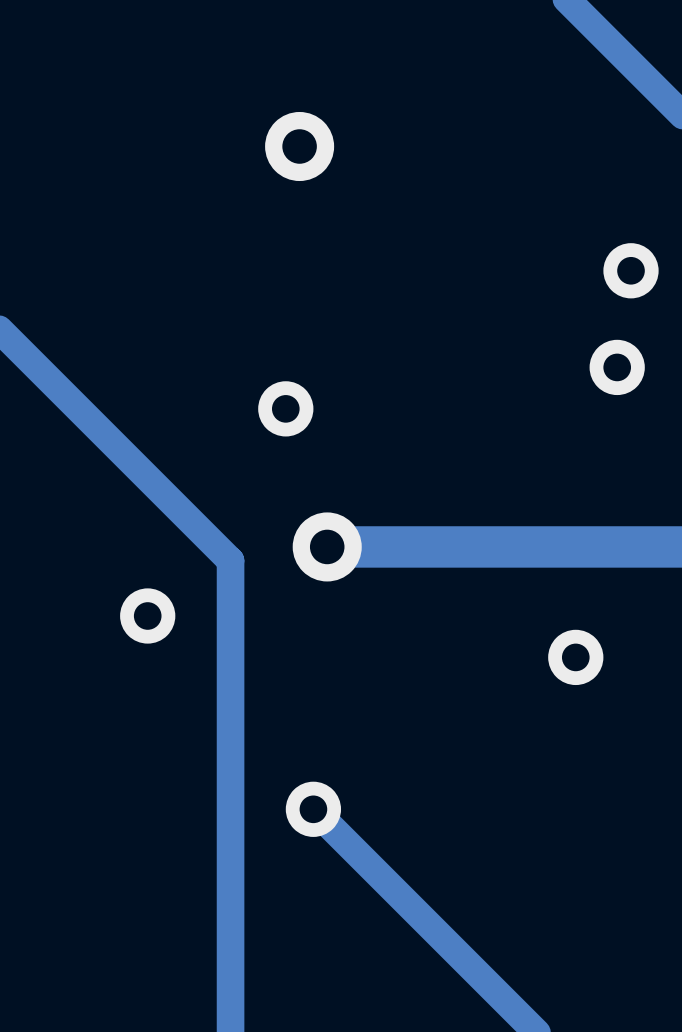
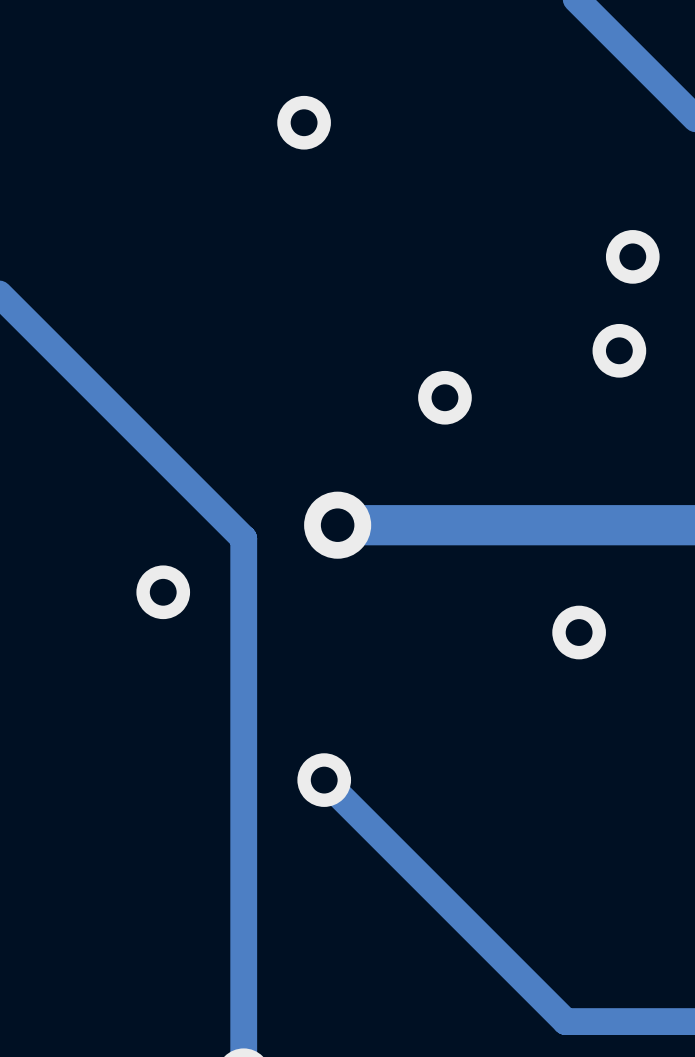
via size: [265, 111, 335, 182] -> [277, 95, 331, 150]
via: (285, 408) -> none
via: none -> (444, 397)

